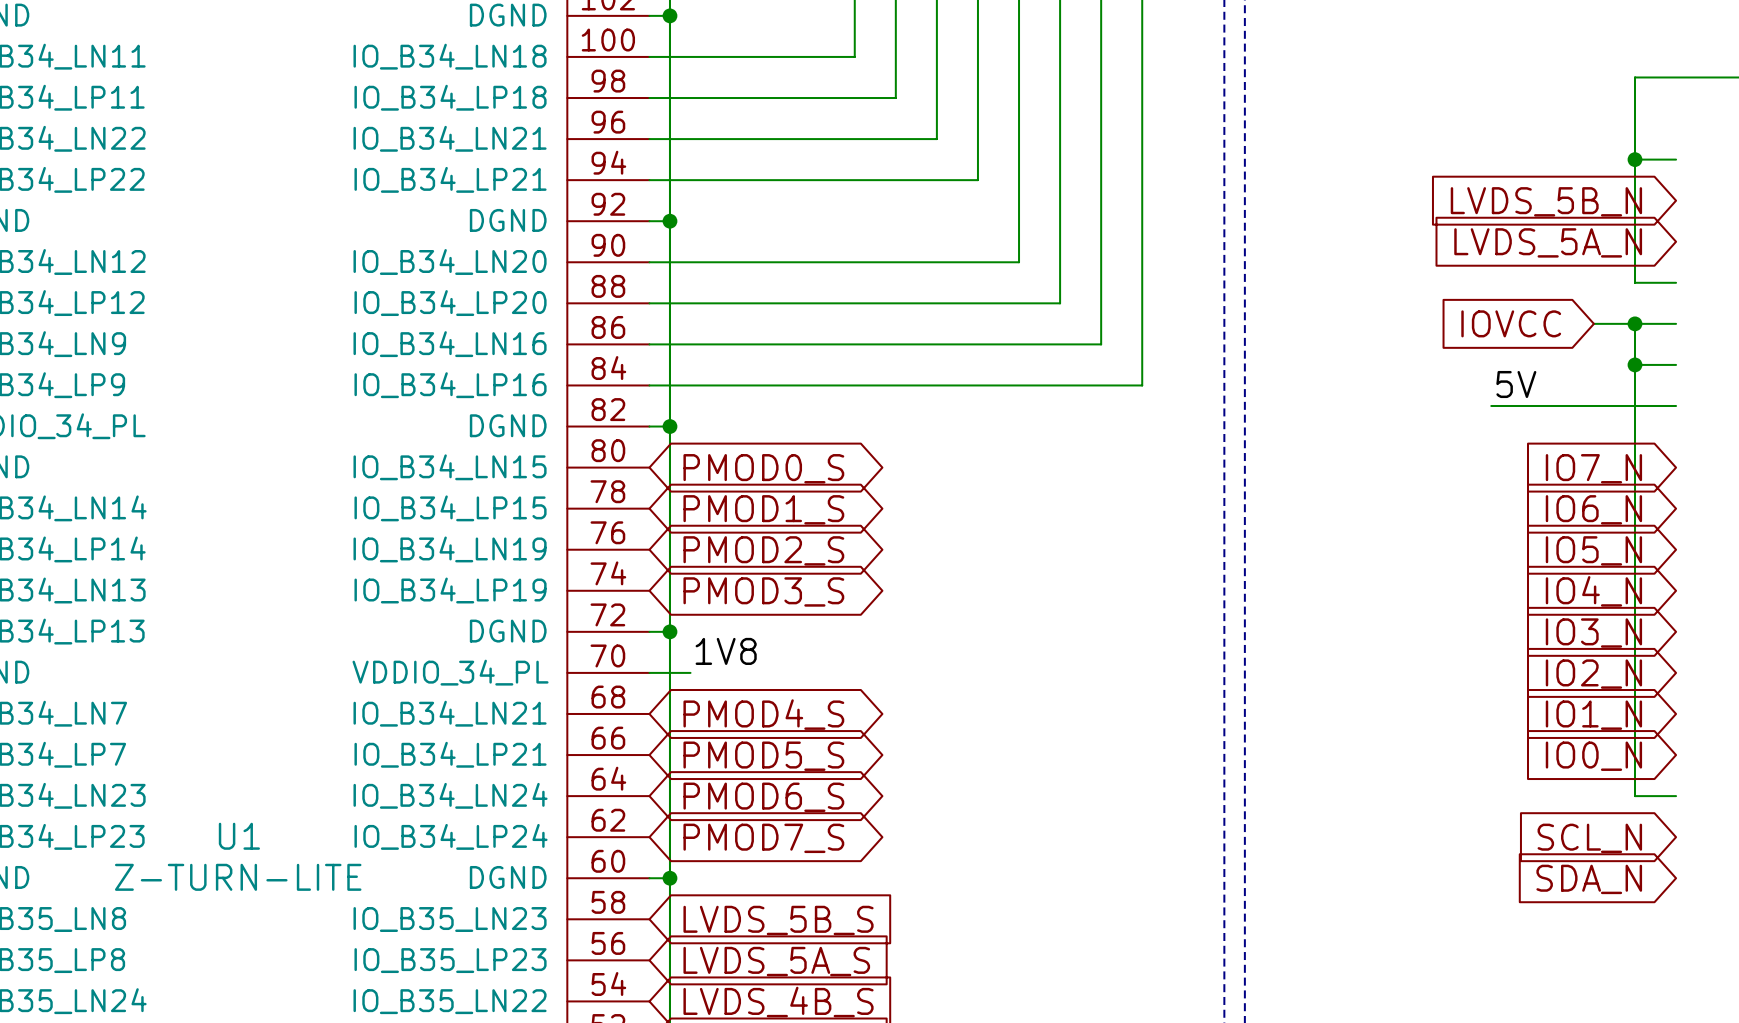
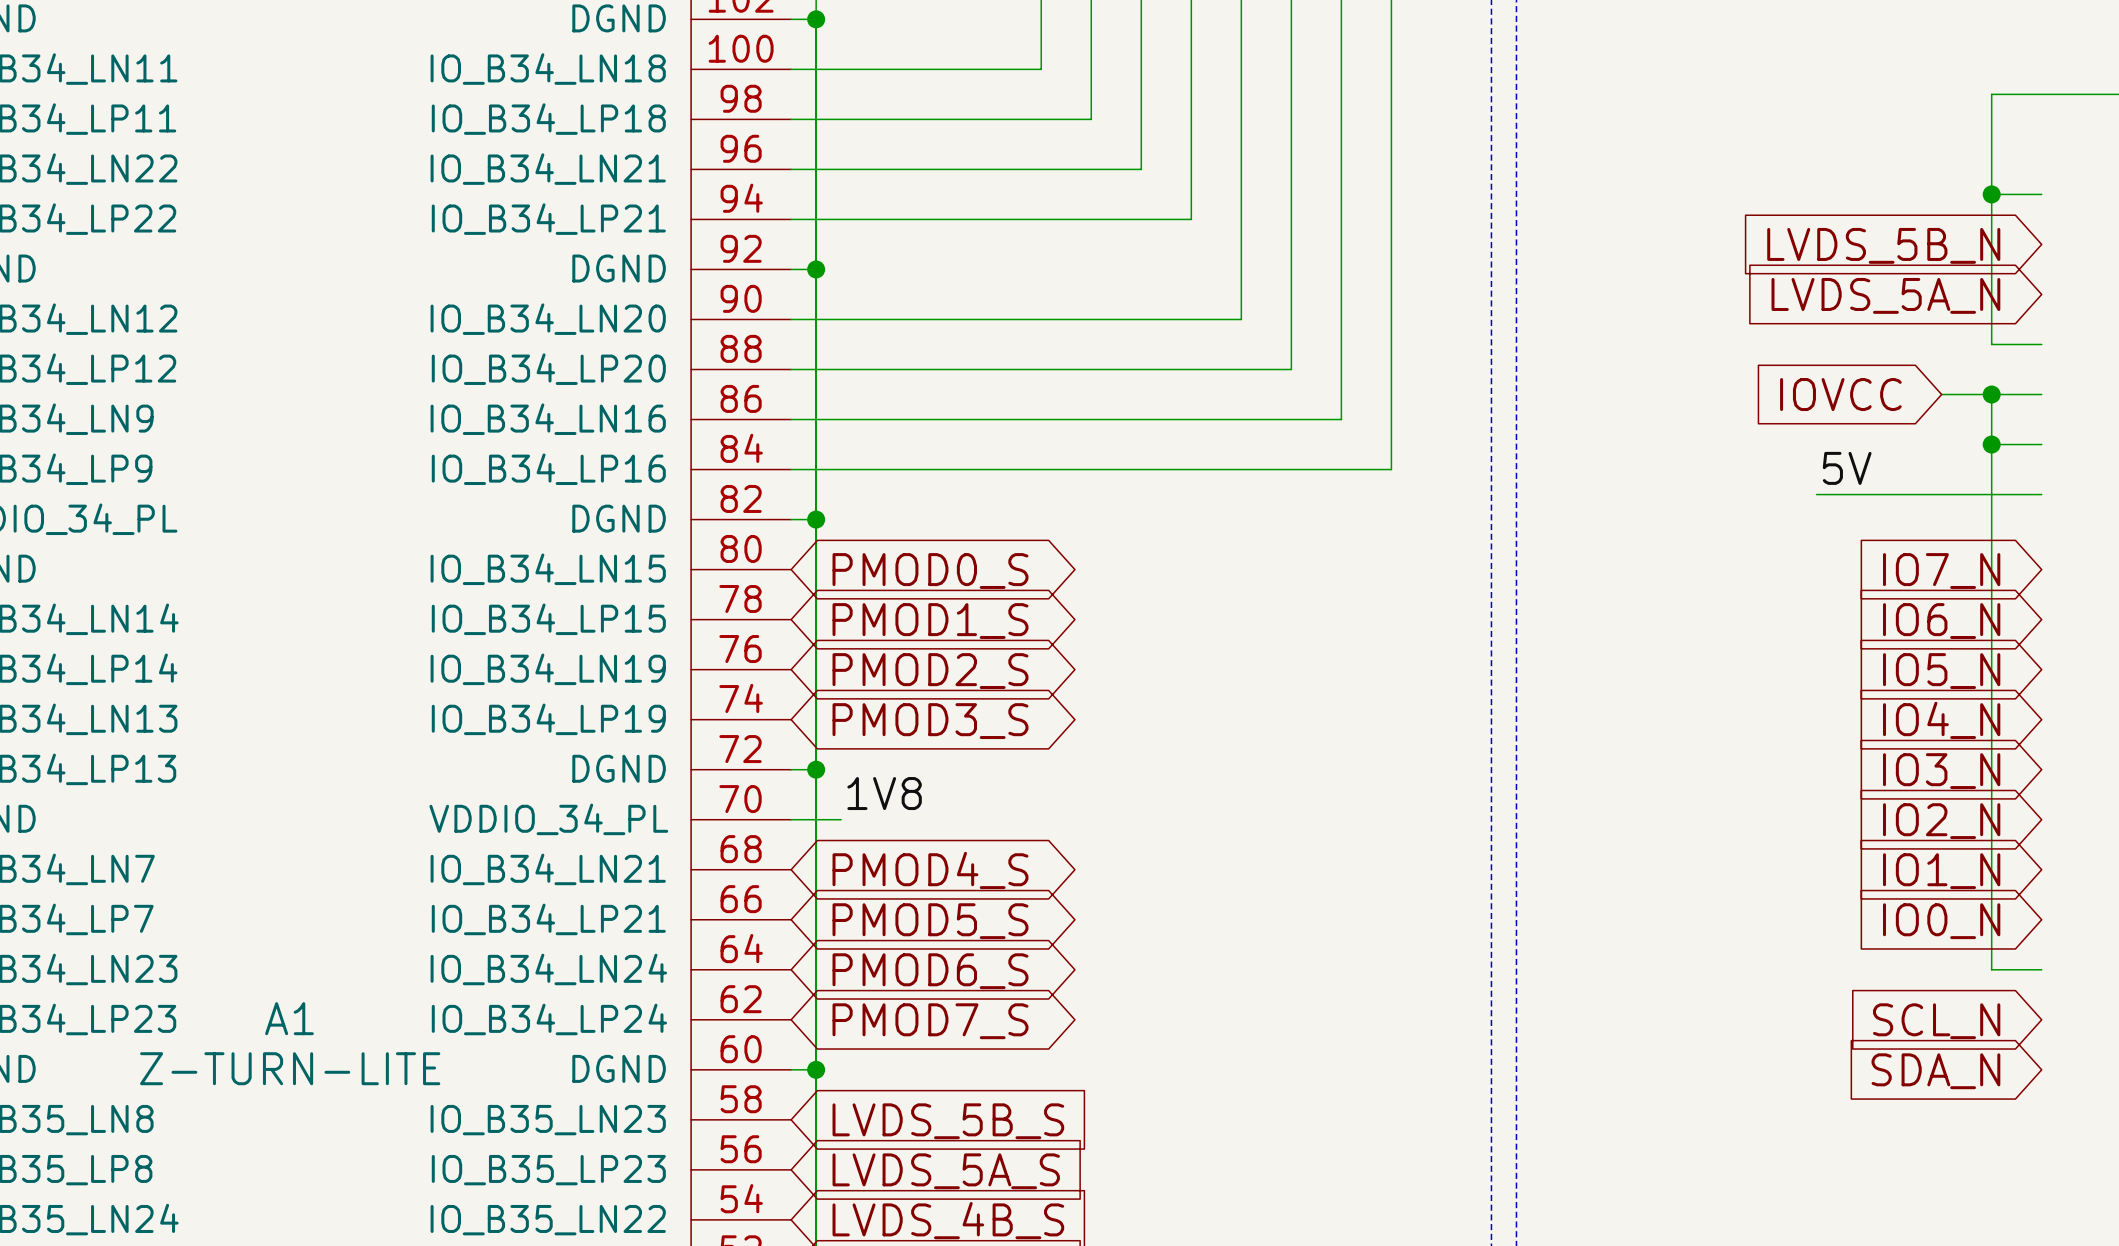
U1 name: U1 (239, 836) -> A1 (289, 1018)

